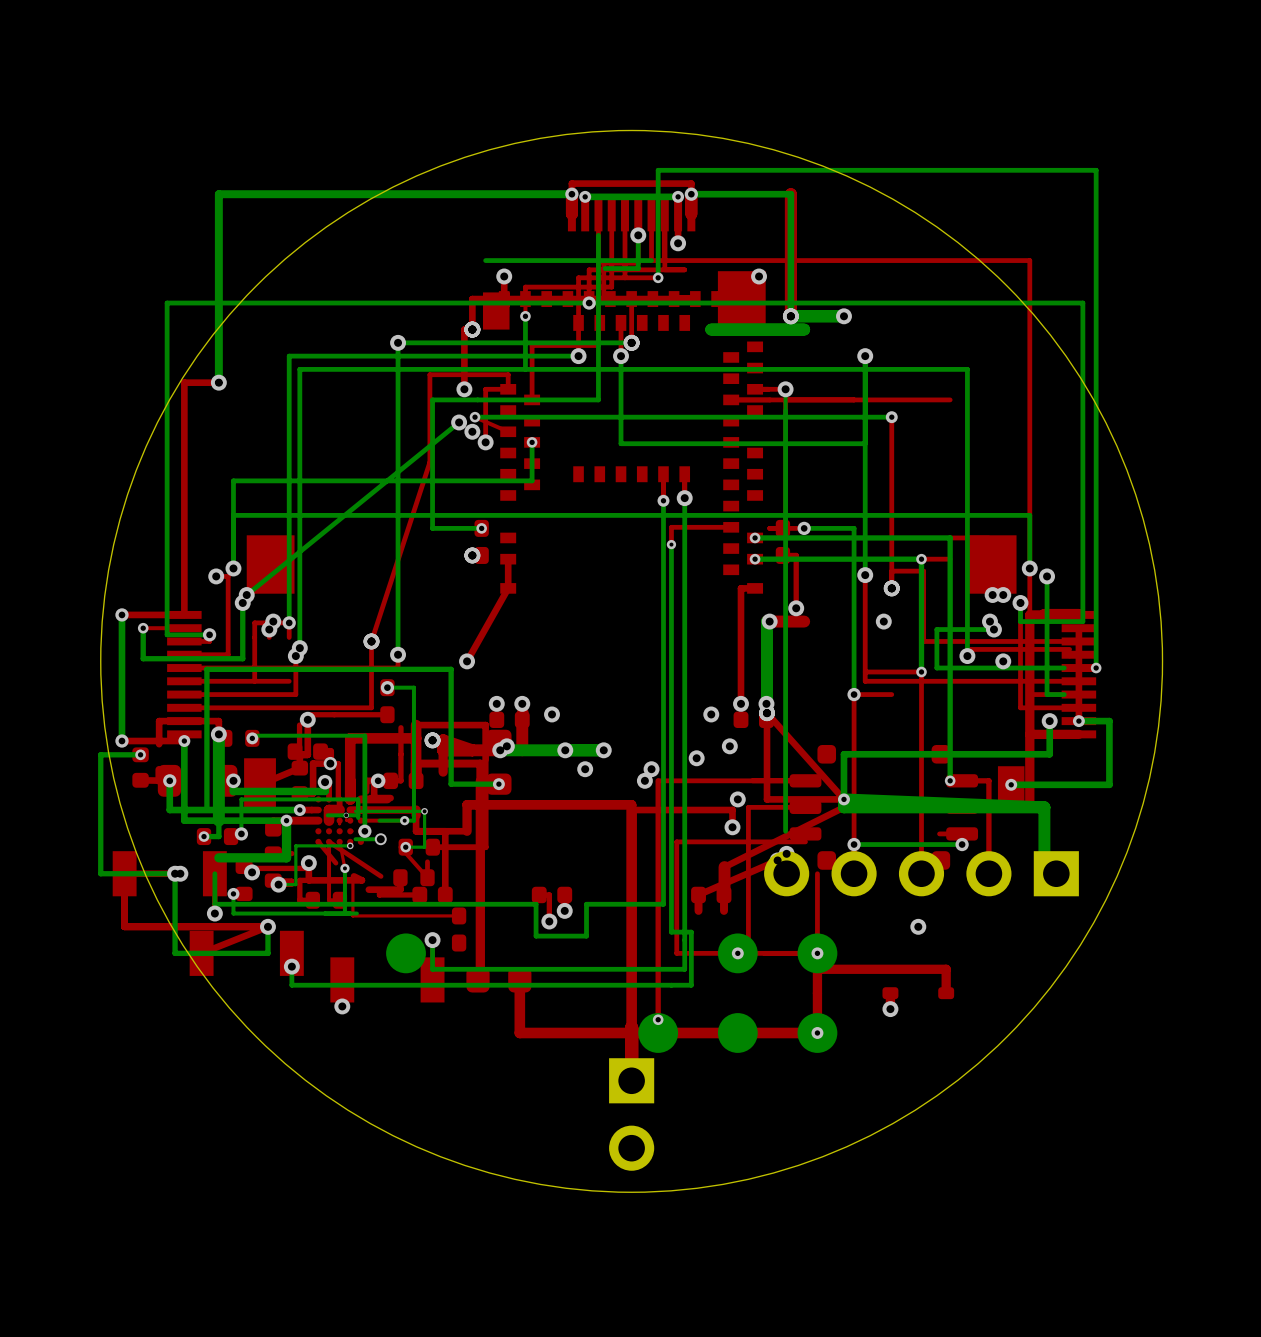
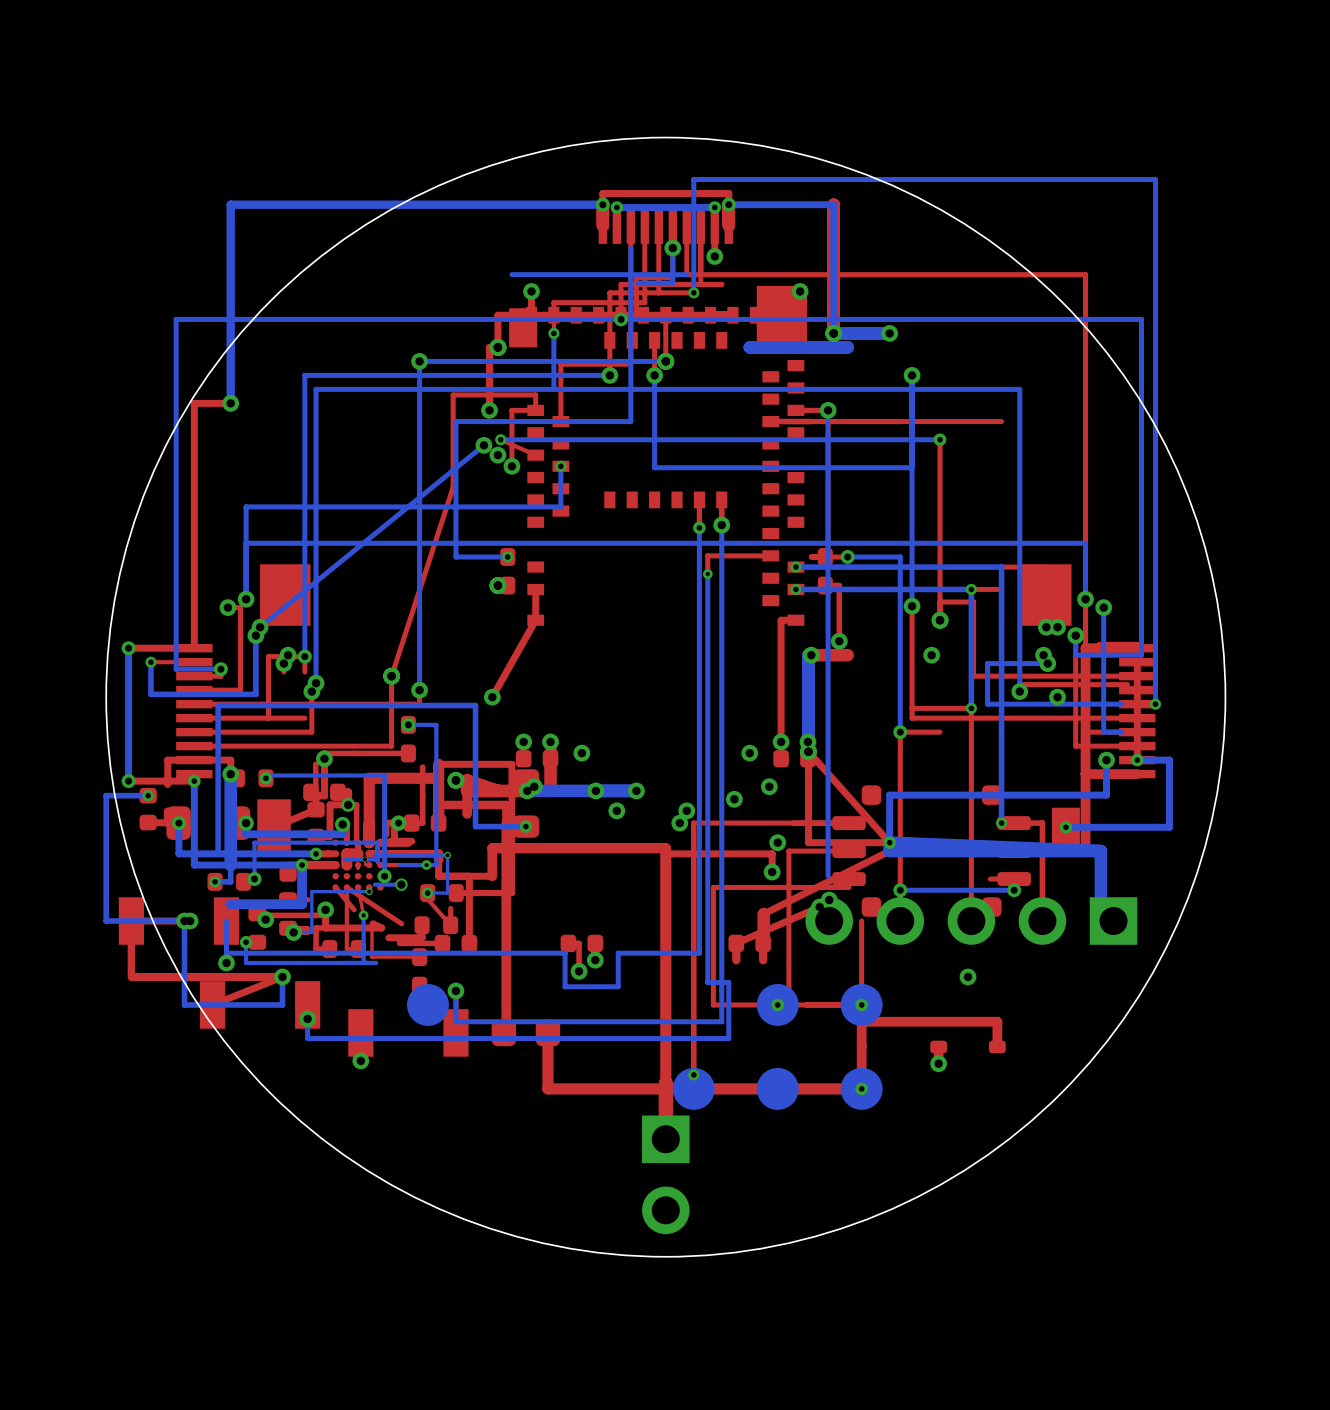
top track: (352, 907) (352, 915) (459, 915) -> (372, 957) (419, 957)
part position: (459, 929) -> (419, 971)

